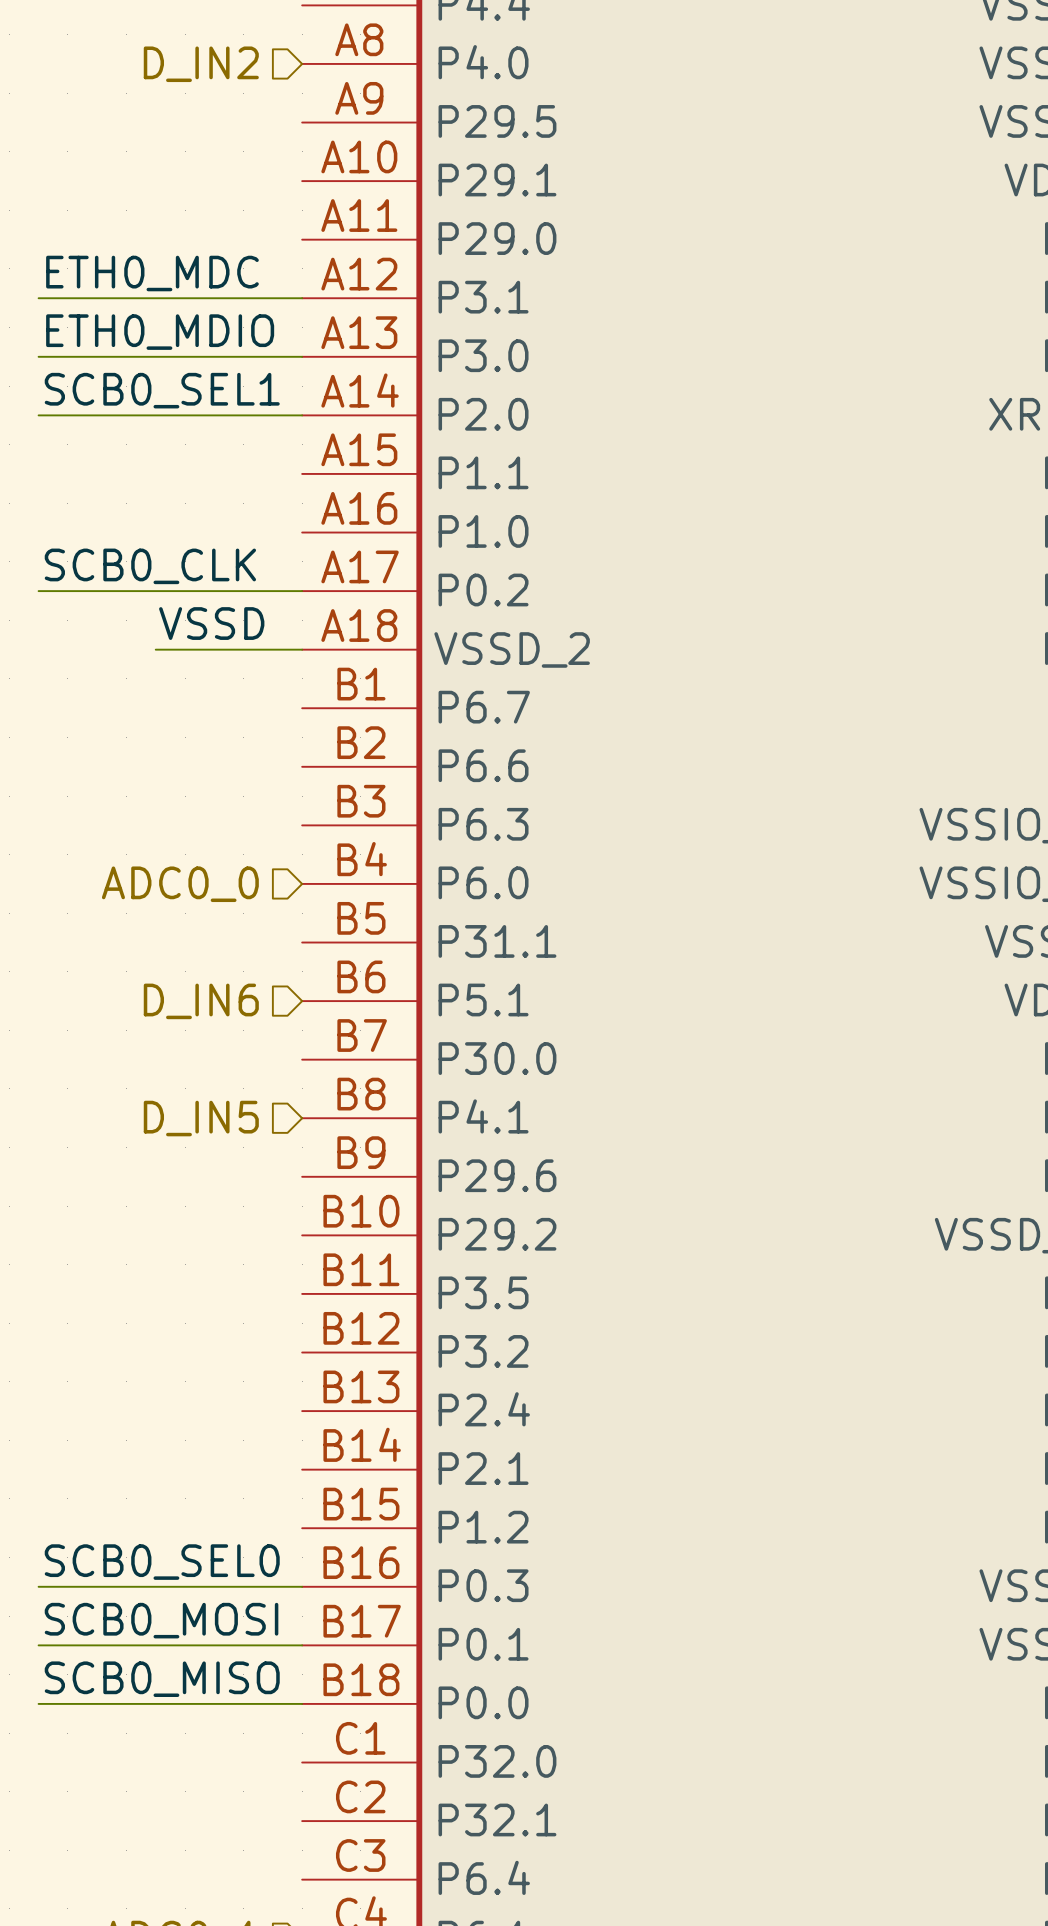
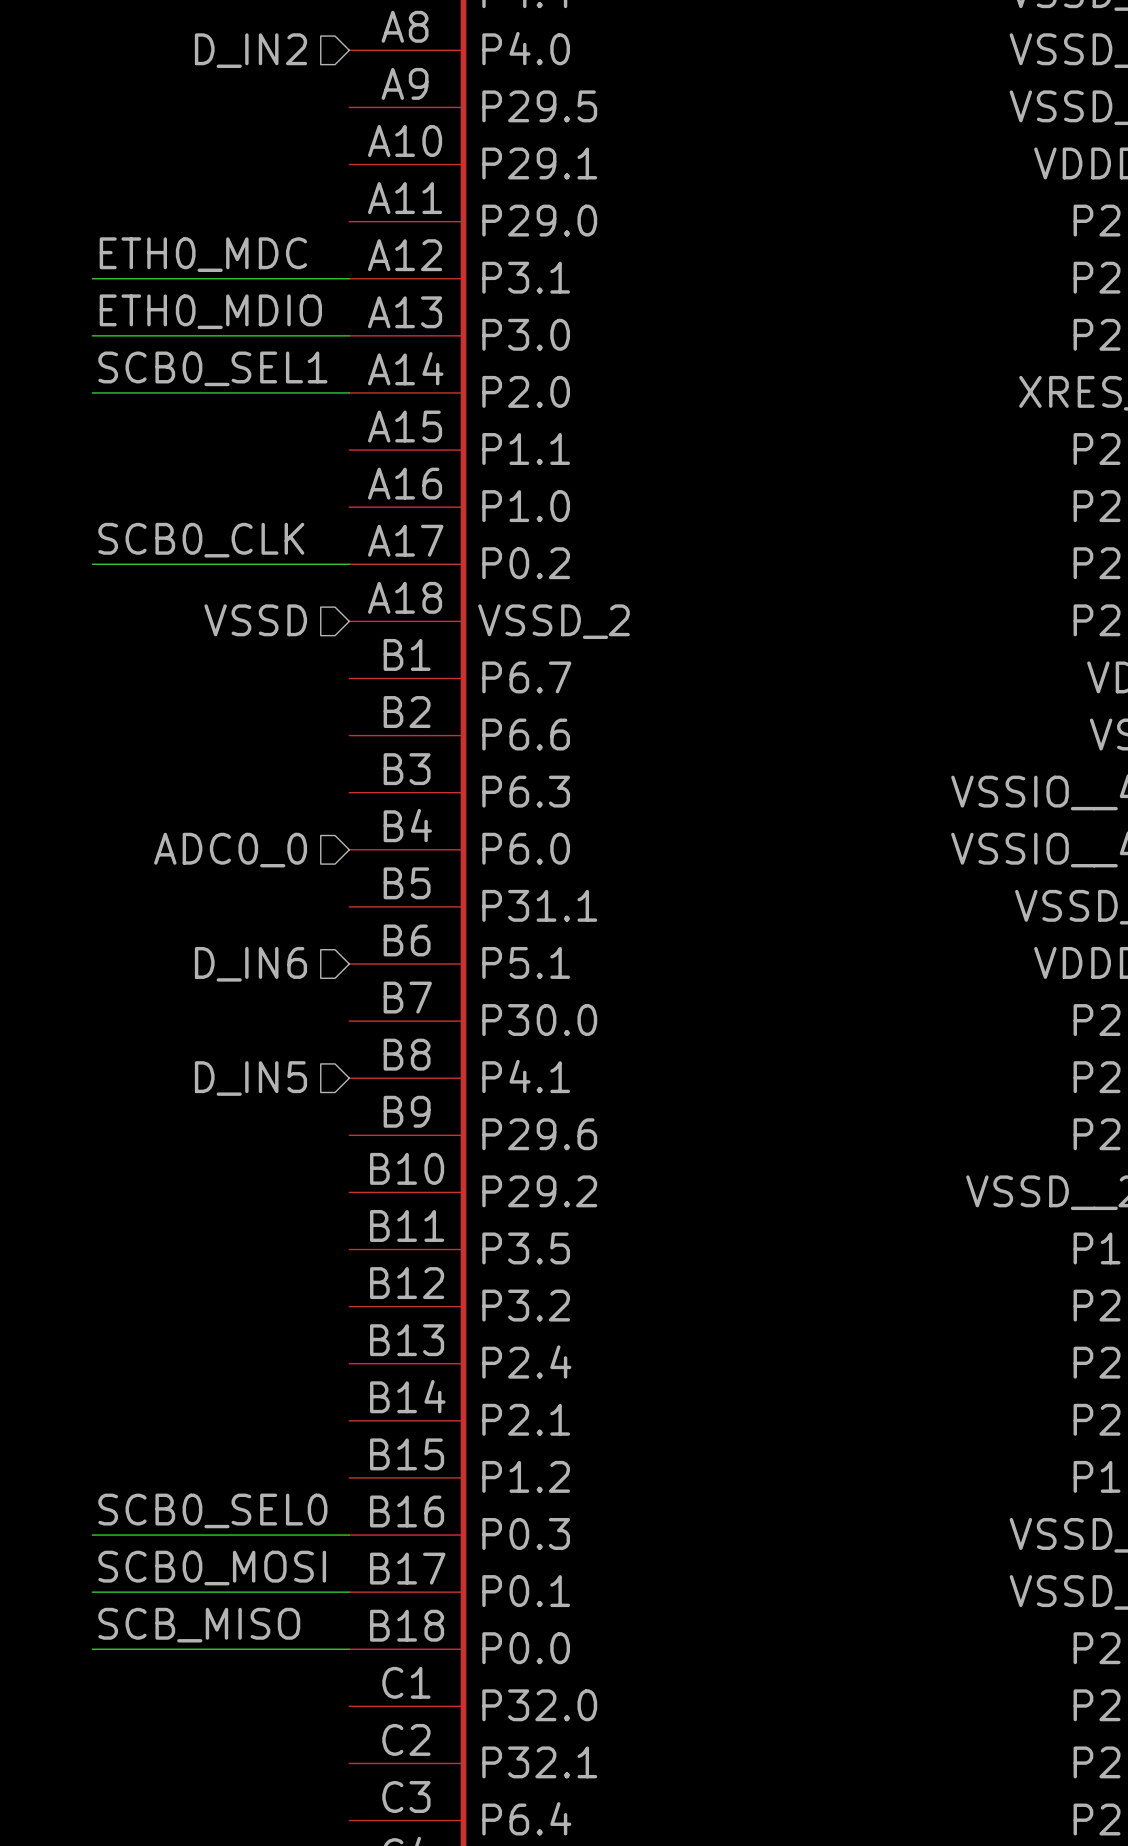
label: VSSD (211, 623) -> none
hierarchical label: none -> VSSD (255, 620)
wire: (155, 649) (302, 649) -> none
label: SCB0_MISO (162, 1679) -> SCB_MISO (199, 1625)

